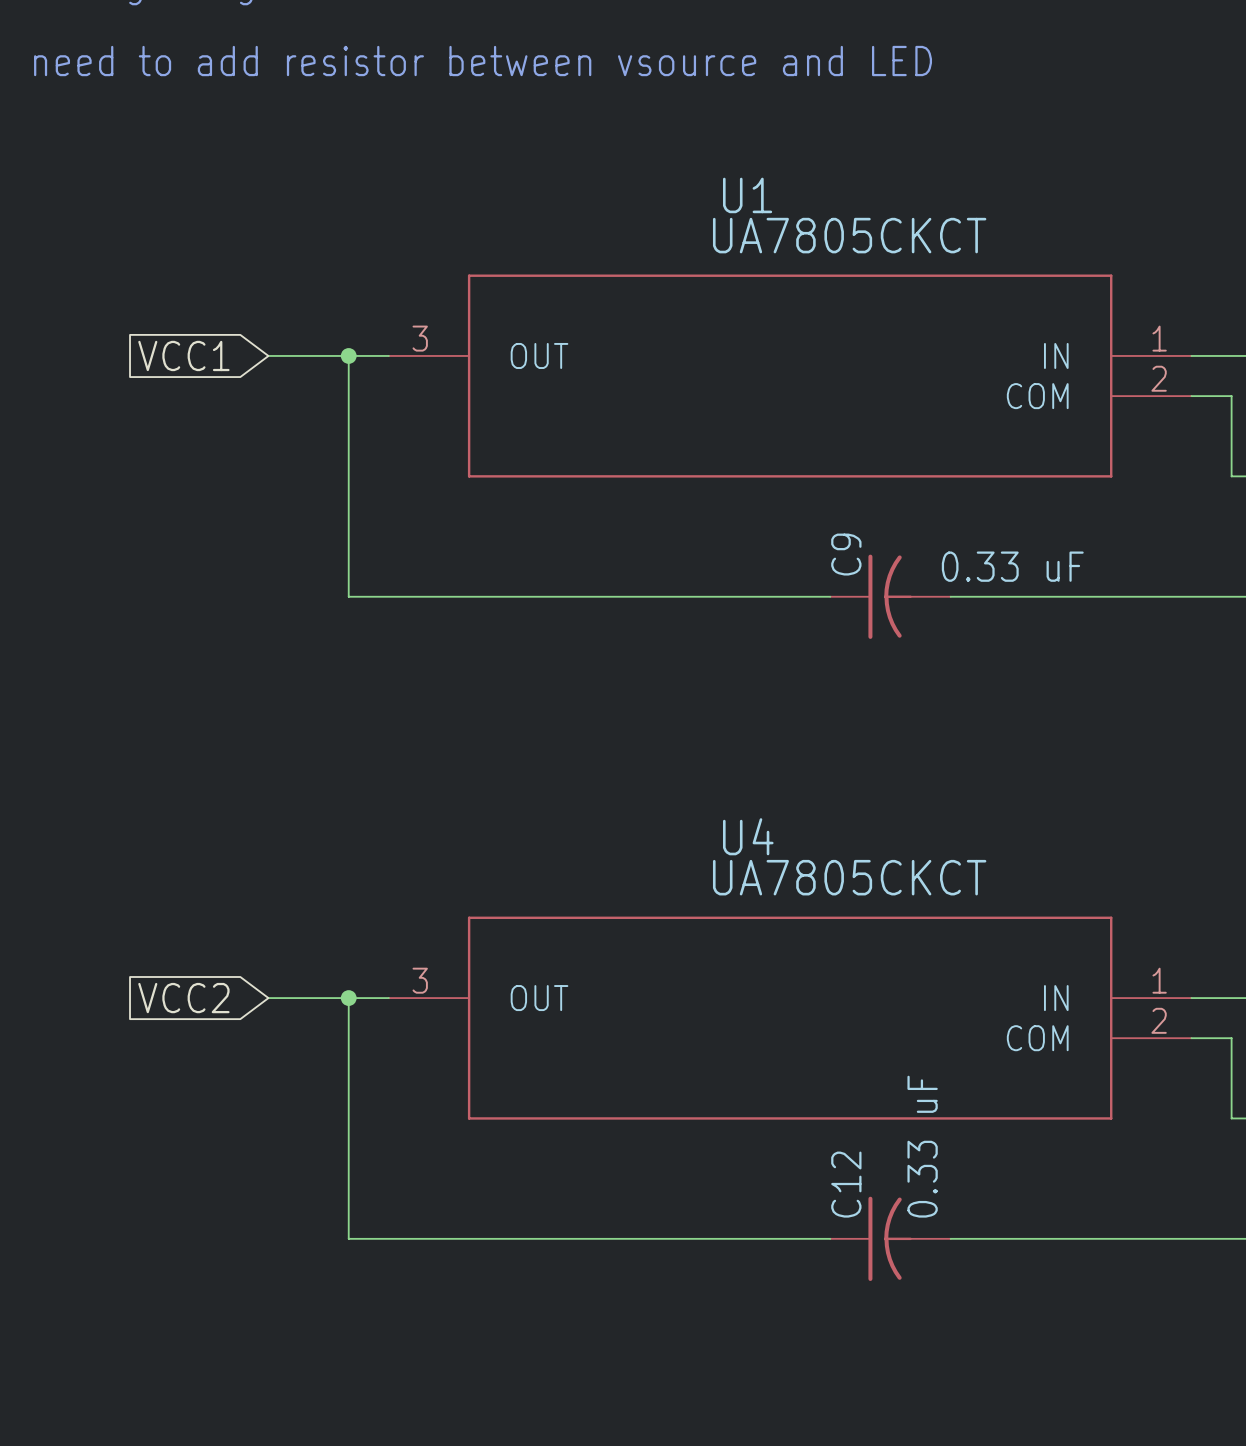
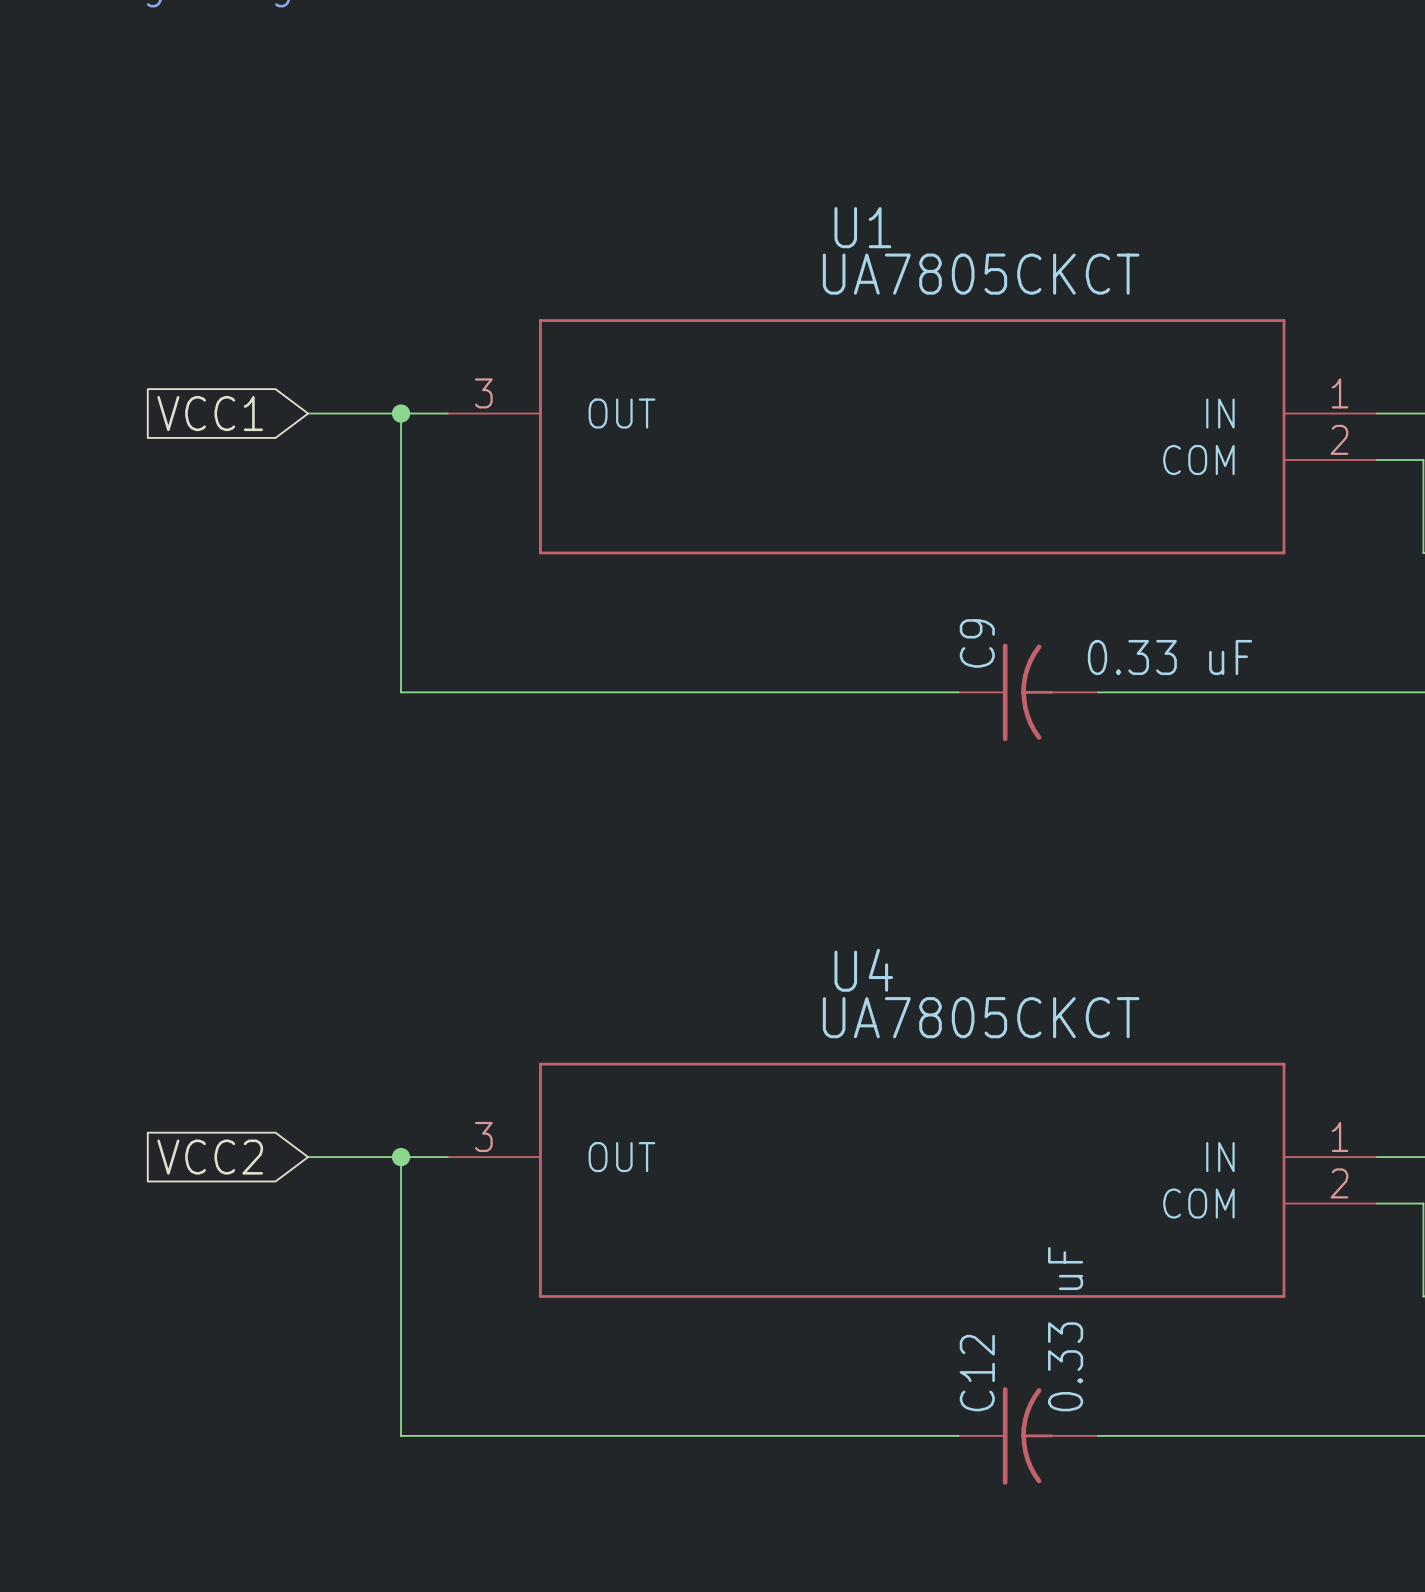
text: need to add resistor between vsource and LED (483, 61) -> none

